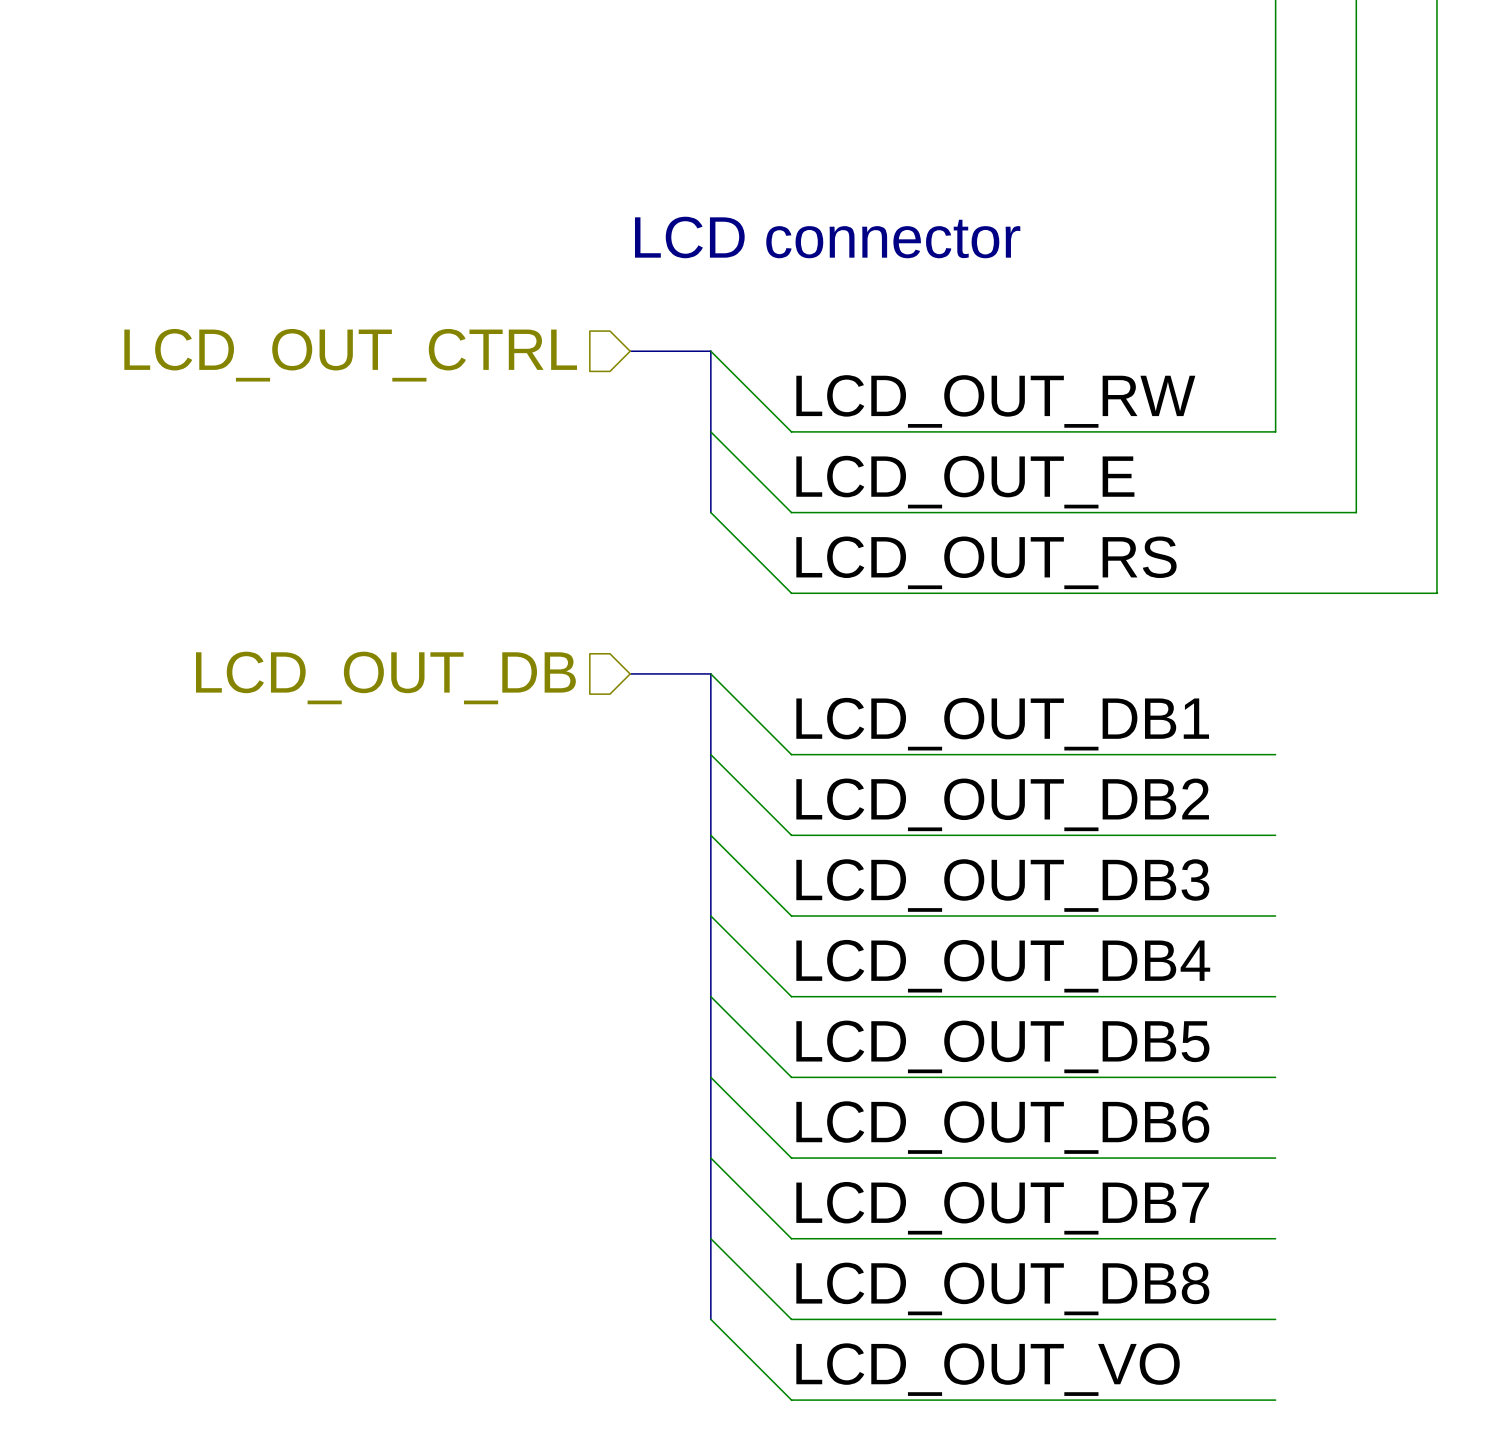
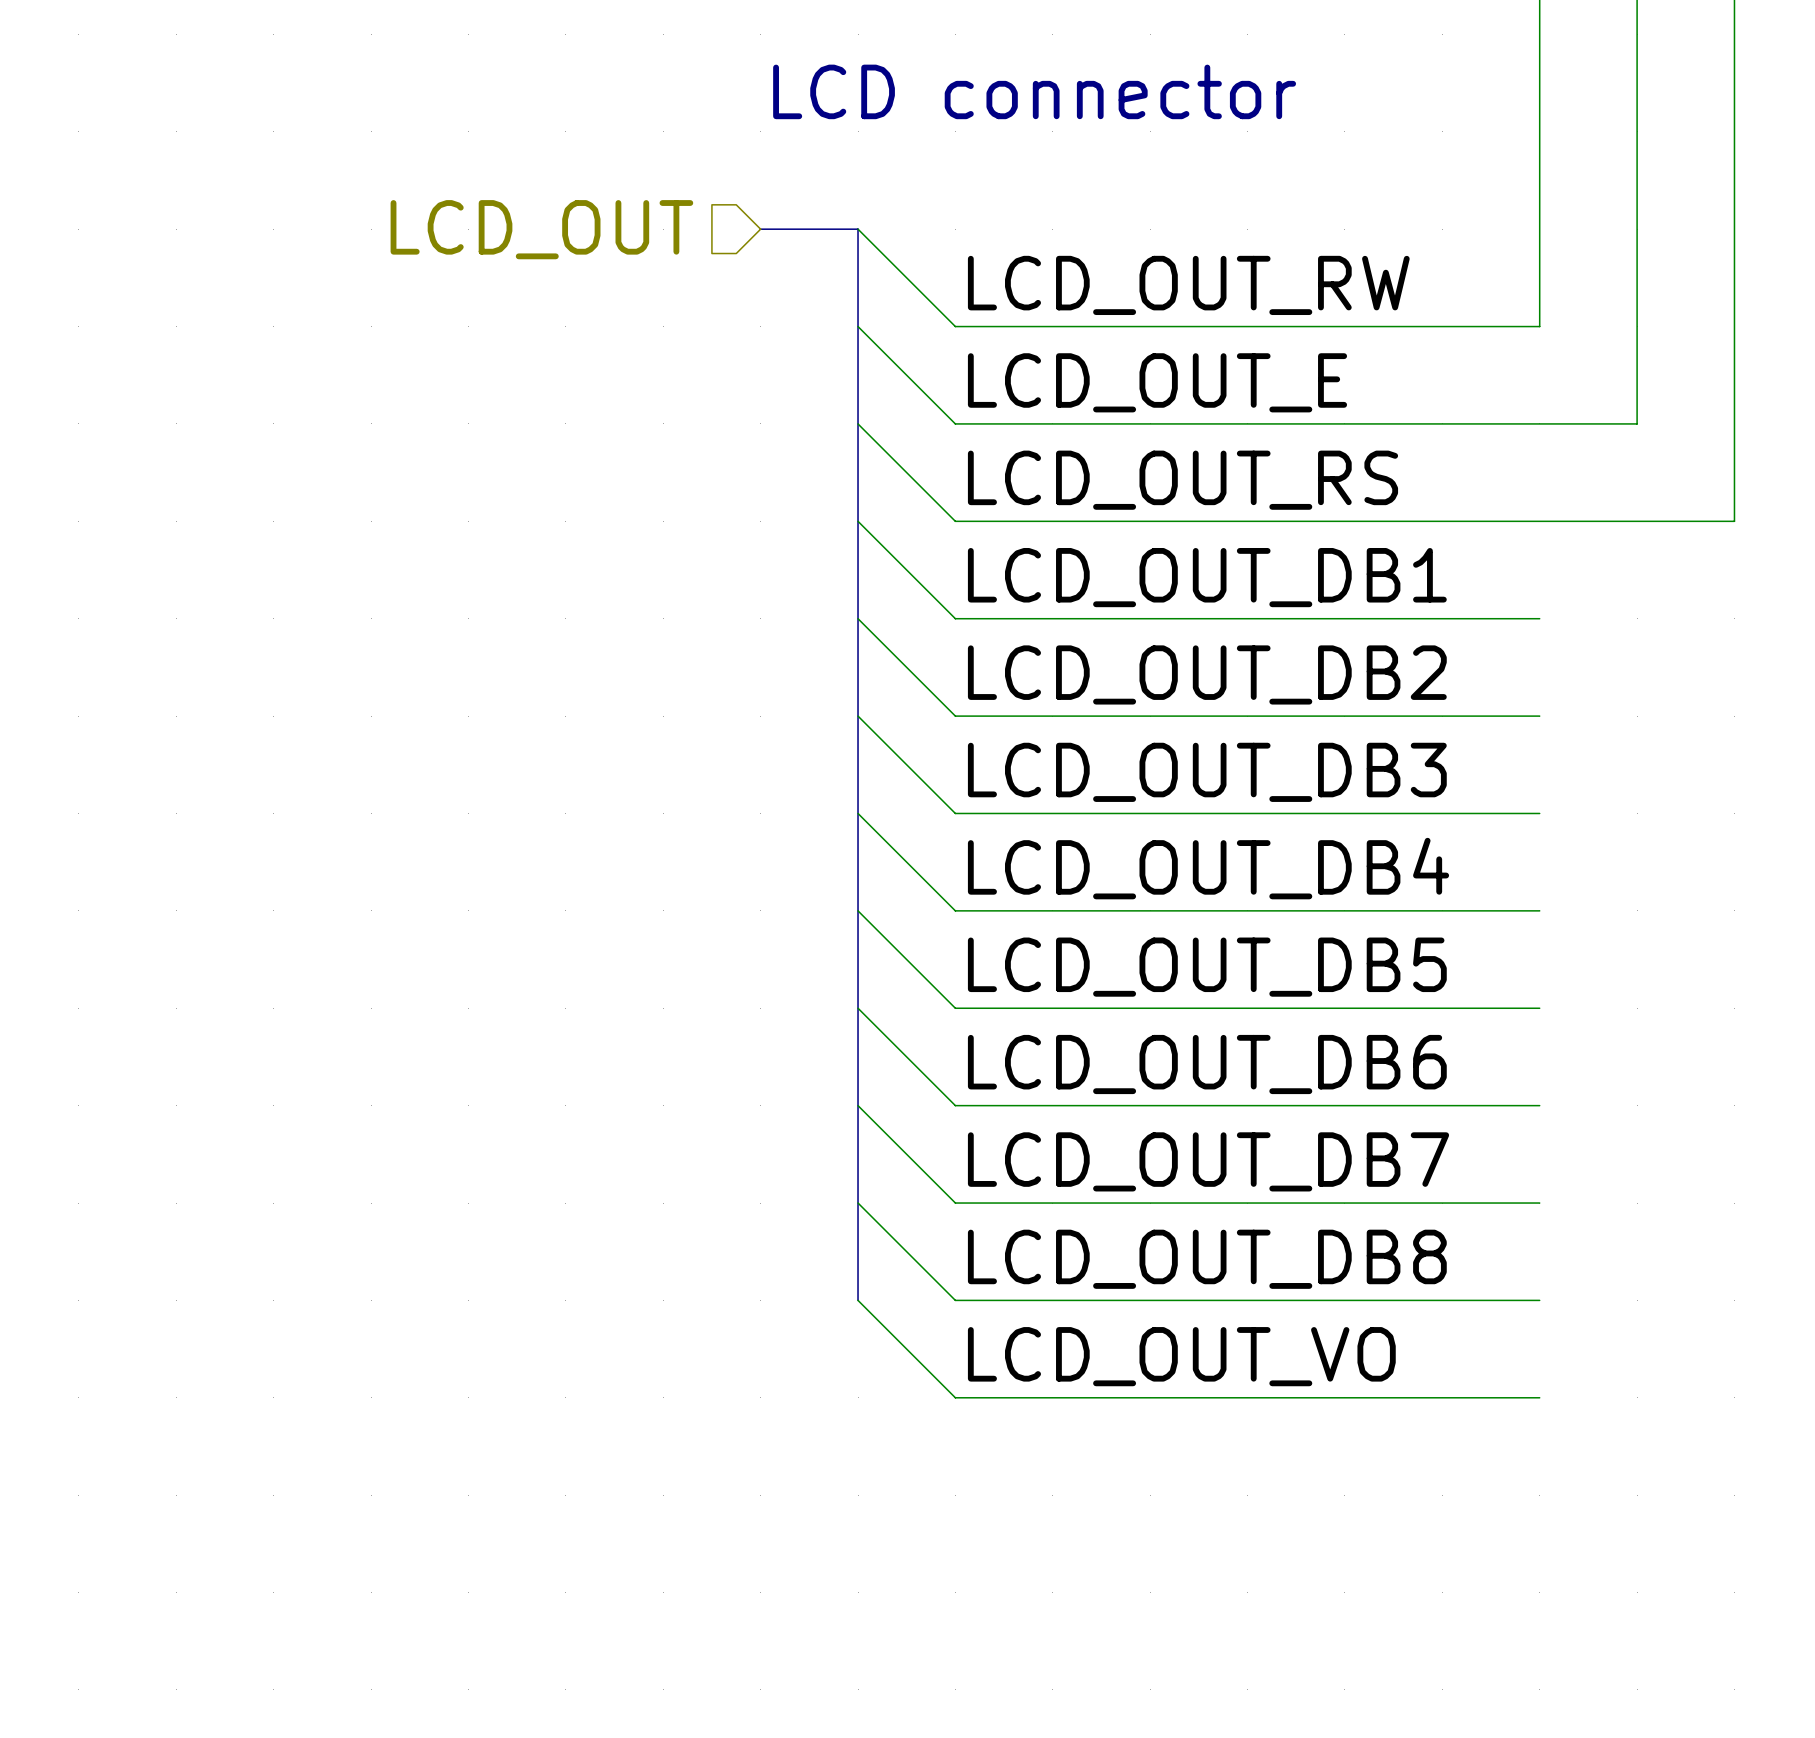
hierarchical label: none -> LCD_OUT (541, 229)
text position: LCD connector (827, 237) -> LCD connector (1034, 91)
label: none -> LCD_OUT_RW (1188, 285)
wire: (1275, 270) (1275, 431) -> (1539, 326) (955, 326) (858, 229)
label: none -> LCD_OUT_E (1157, 382)
bus: (630, 351) (710, 351) -> (760, 229) (858, 229) (858, 423)
wire: (1356, 351) (1356, 512) (1275, 512) -> (1637, 423) (955, 423) (858, 326)
hierarchical label: LCD_OUT_CTRL (350, 355) -> none
label: LCD_OUT_RW (995, 401) -> LCD_OUT_RS (1182, 480)
wire: (1436, 431) (1436, 593) (1275, 593) -> (1734, 521) (1539, 521)
label: LCD_OUT_E (965, 482) -> LCD_OUT_DB1 (1207, 577)
label: LCD_OUT_RS (986, 562) -> LCD_OUT_DB2 (1207, 674)
label: none -> LCD_OUT_DB3 (1207, 772)
bus: (630, 673) (710, 673) -> (858, 618) (858, 813)
hierarchical label: LCD_OUT_DB (385, 677) -> none
label: LCD_OUT_DB1 (1002, 724) -> LCD_OUT_DB4 (1208, 868)
label: LCD_OUT_DB2 (1002, 804) -> LCD_OUT_DB5 (1207, 967)
label: LCD_OUT_DB3 (1002, 885) -> LCD_OUT_DB6 (1207, 1064)
label: LCD_OUT_DB4 (1003, 966) -> LCD_OUT_DB7 (1208, 1161)
label: LCD_OUT_DB5 (1002, 1046) -> LCD_OUT_DB8 (1207, 1259)
bus: (710, 1077) (710, 1319) -> none
label: LCD_OUT_DB6 (1002, 1127) -> LCD_OUT_VO (1181, 1356)
wire: (710, 1158) (791, 1238) (1275, 1238) -> (858, 716) (955, 813) (1539, 813)
label: LCD_OUT_DB7 (1002, 1208) -> none
wire: (710, 1238) (791, 1319) (1275, 1319) -> none
label: LCD_OUT_DB8 (1002, 1288) -> none
wire: (710, 1319) (791, 1400) (1275, 1400) -> none
label: LCD_OUT_VO (988, 1369) -> none

